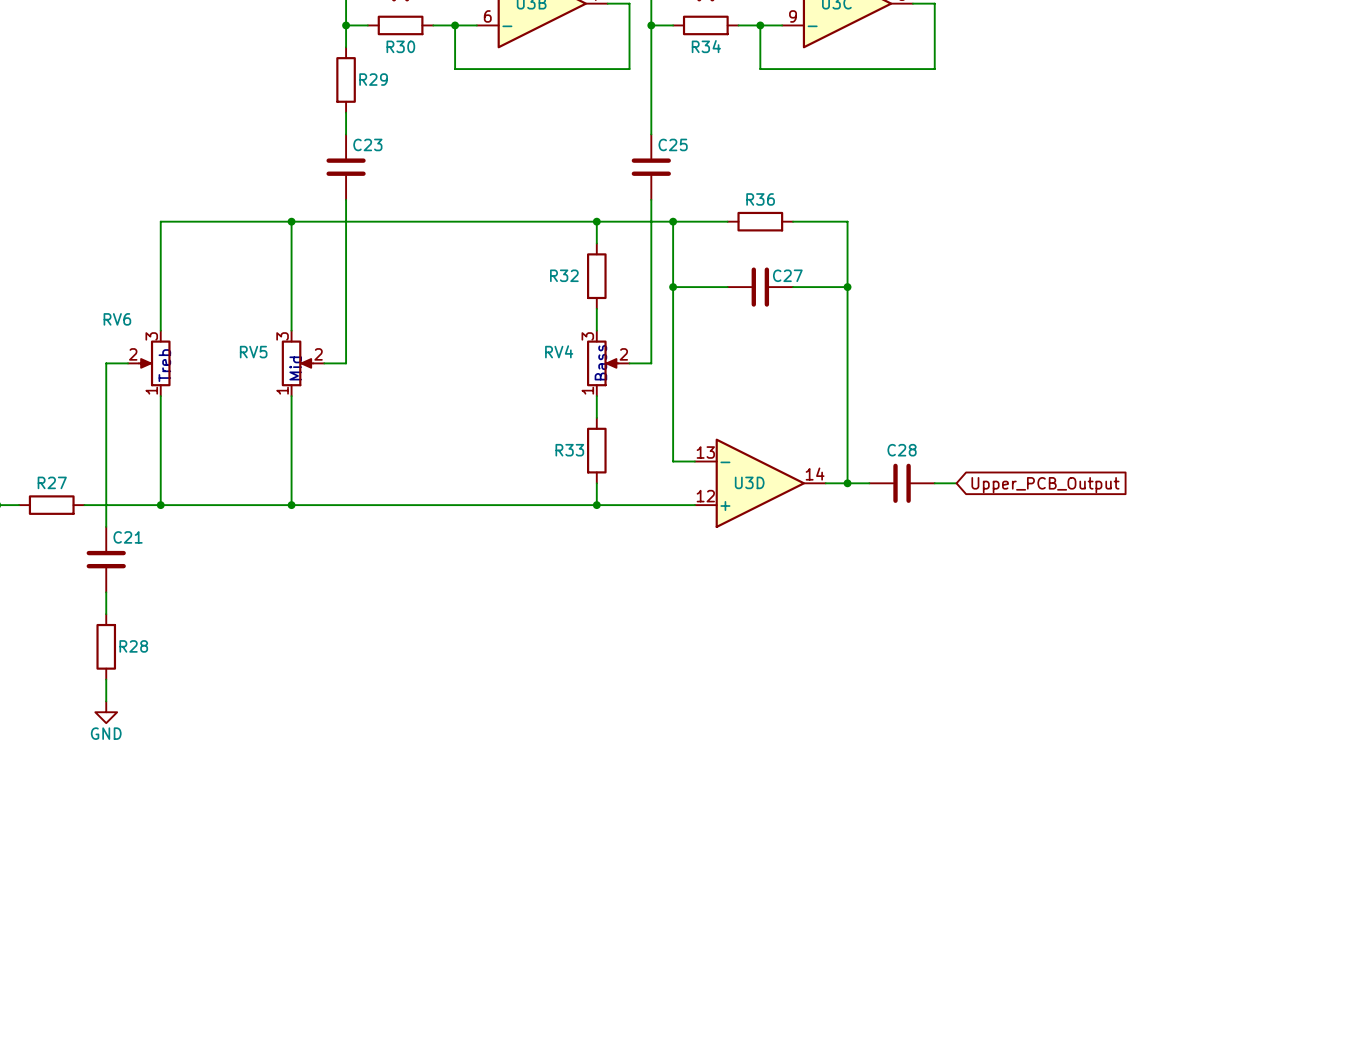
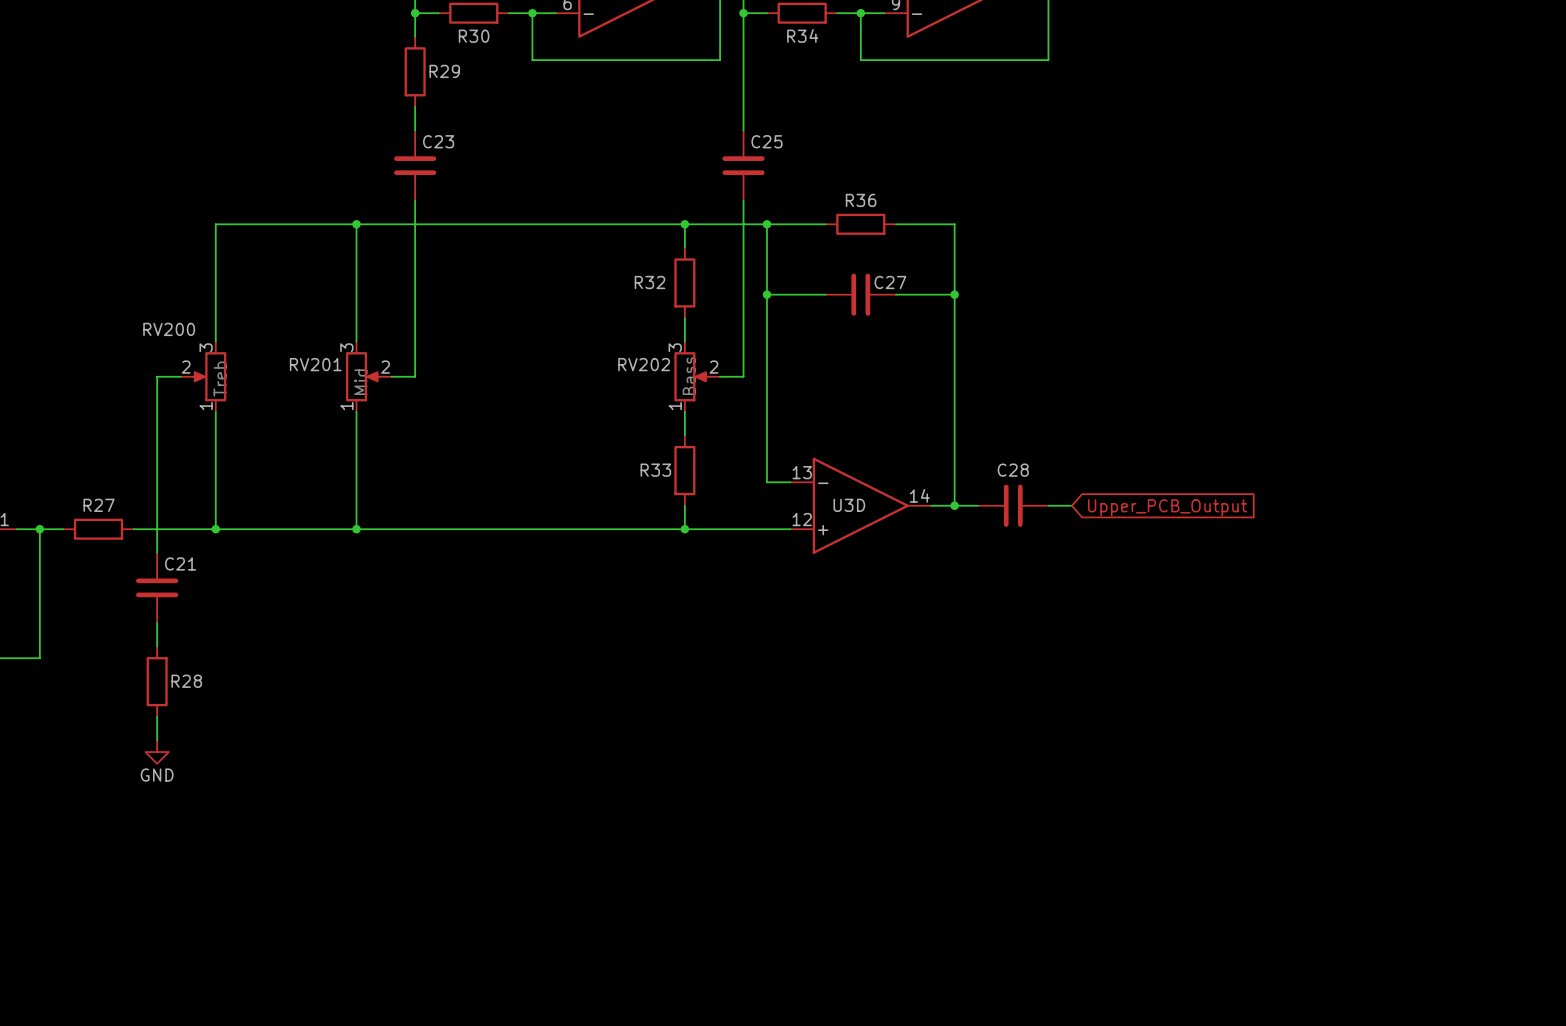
RV6 name: RV6 (117, 319) -> RV200 (169, 329)
RV4 name: RV4 (559, 351) -> RV202 (644, 364)
RV5 name: RV5 (253, 352) -> RV201 (315, 364)

